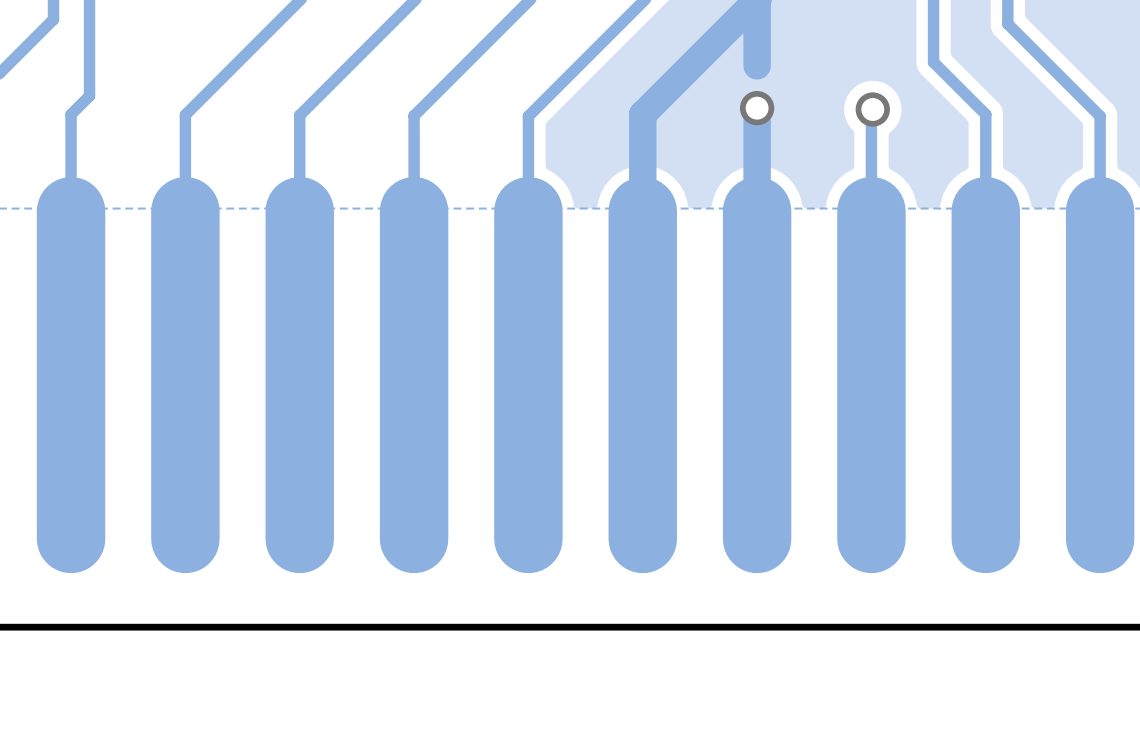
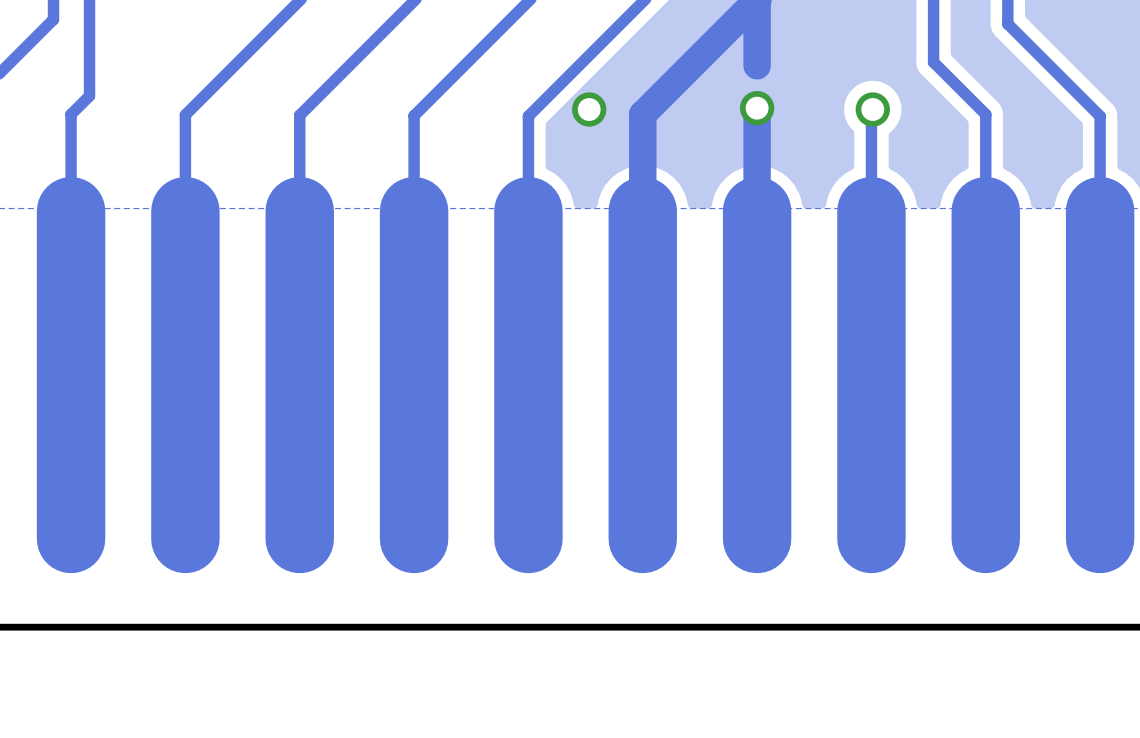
via: none -> (589, 109)

